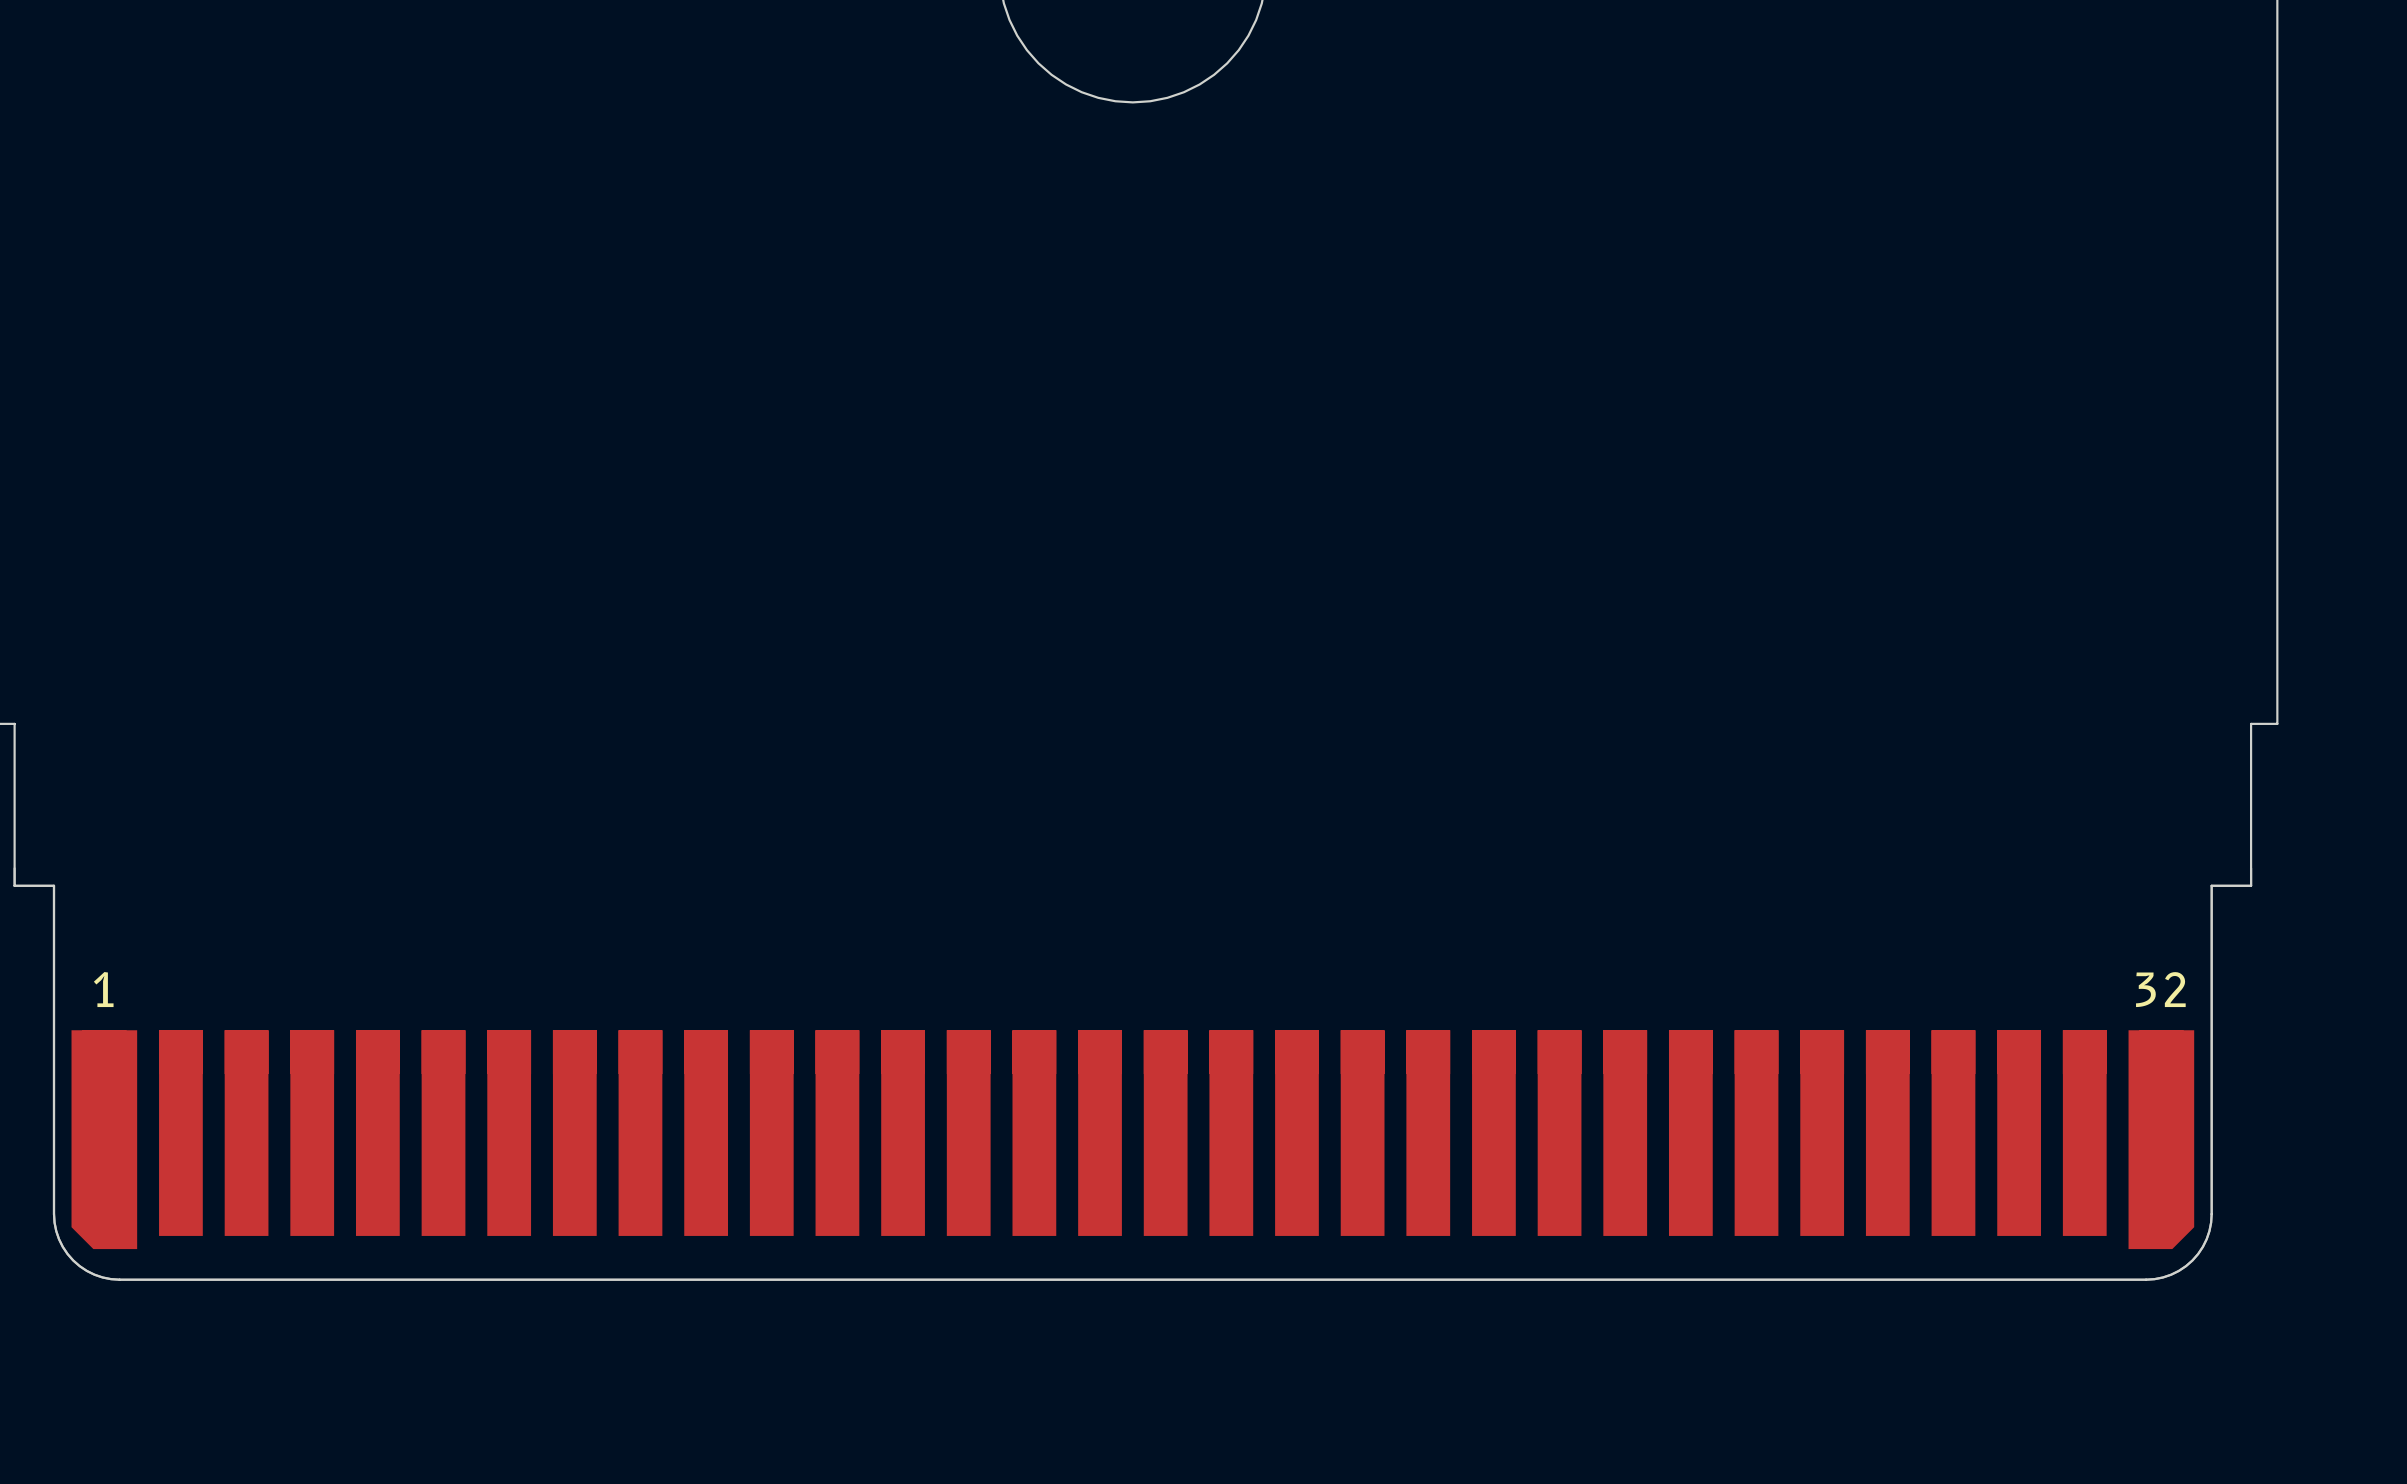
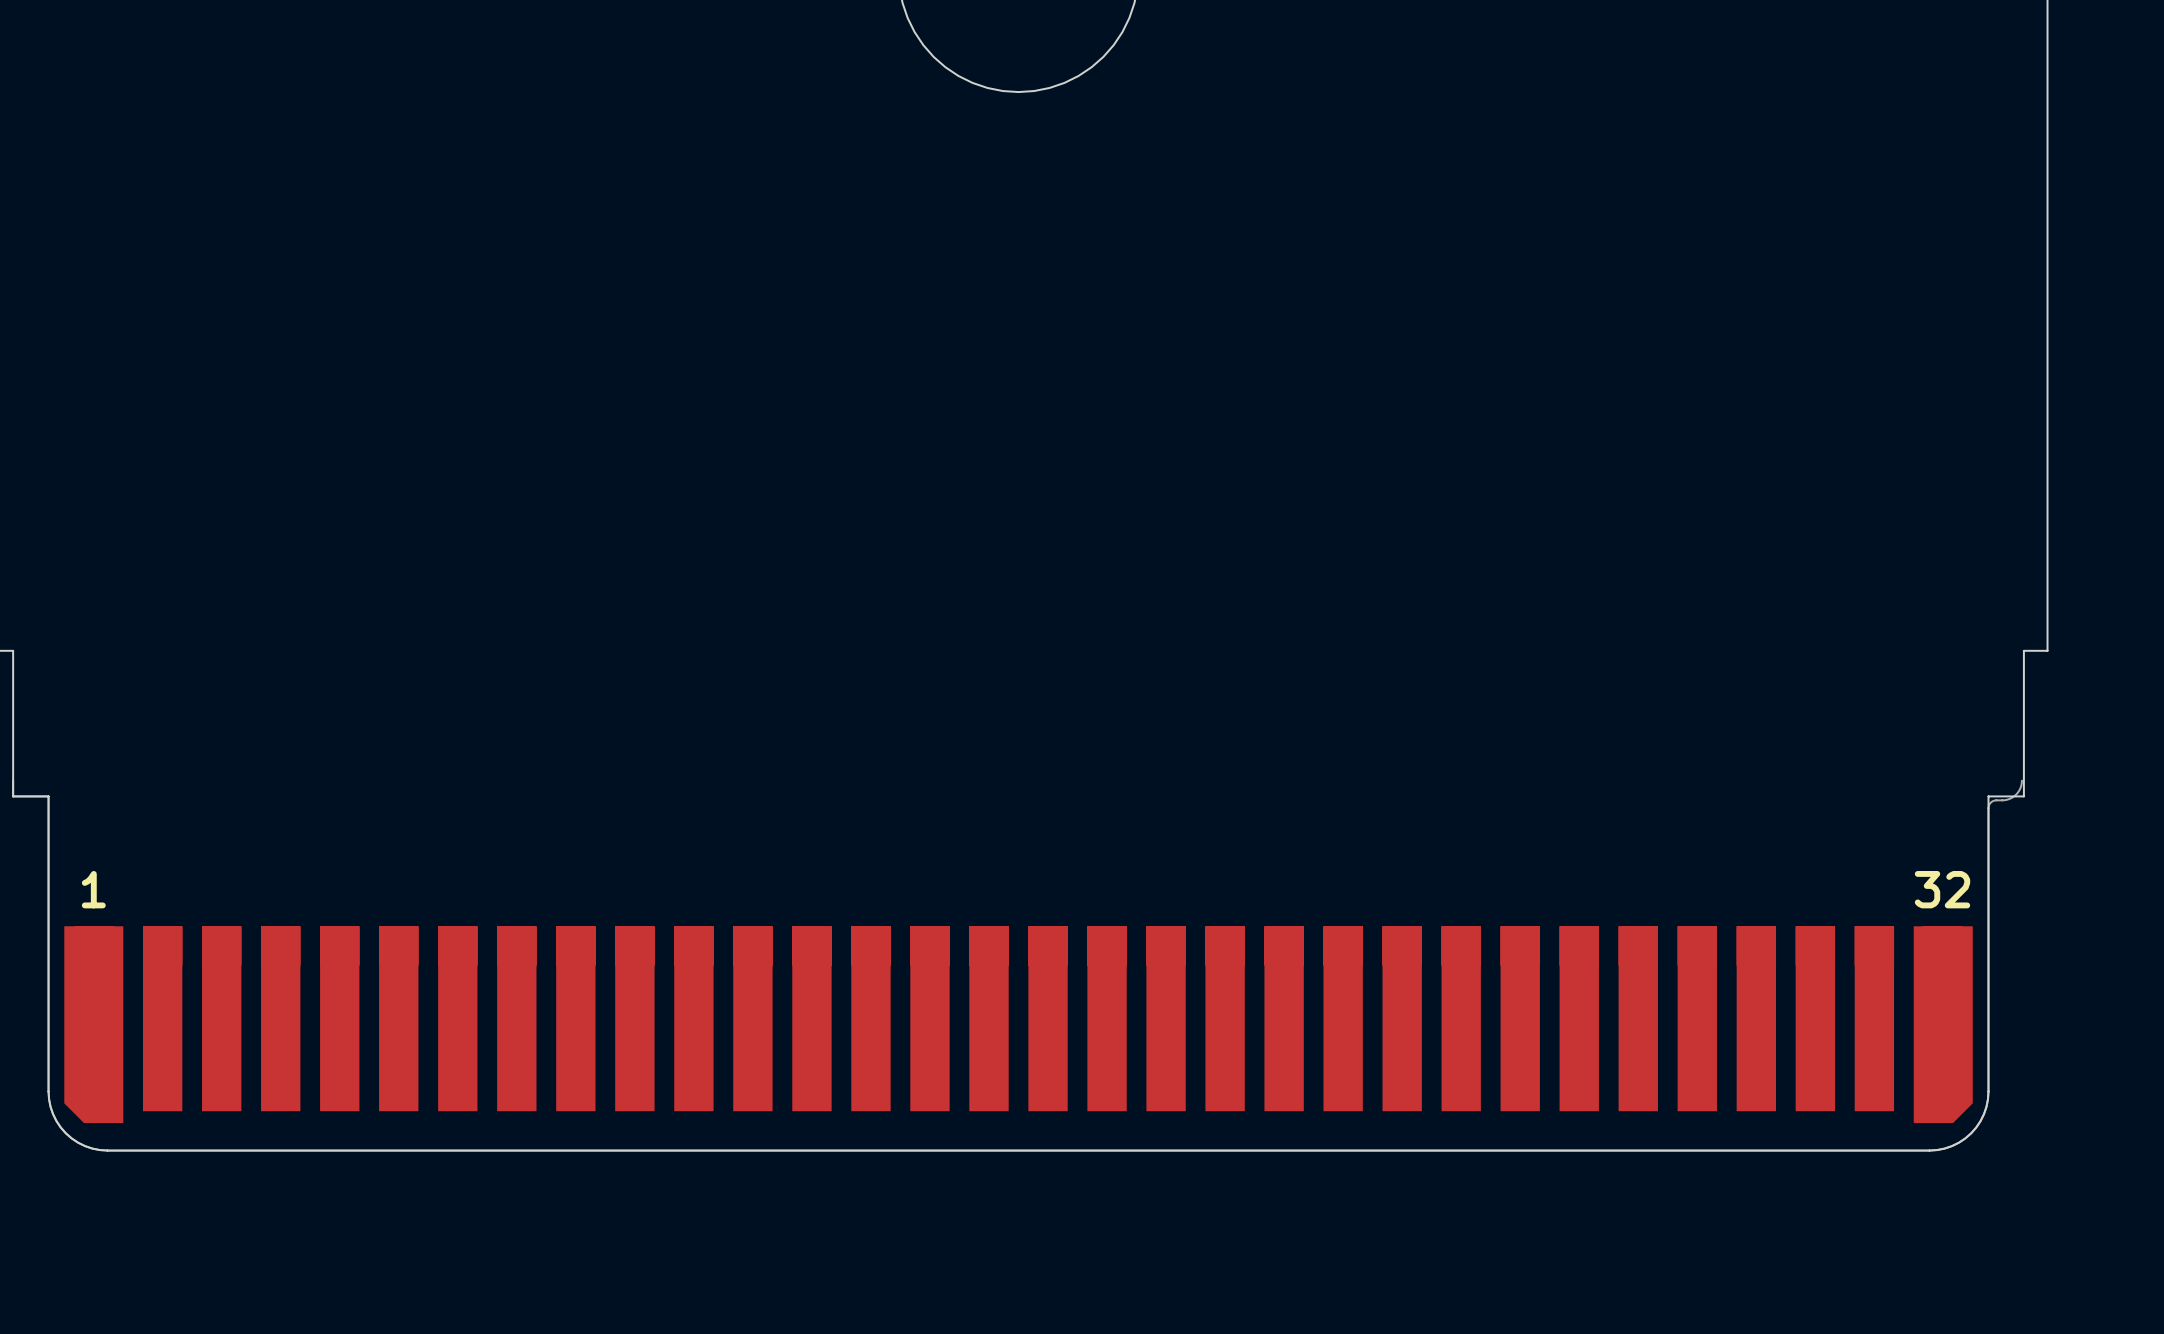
part footprint: [13, 867, 2253, 1281] -> [12, 779, 2023, 1152]

